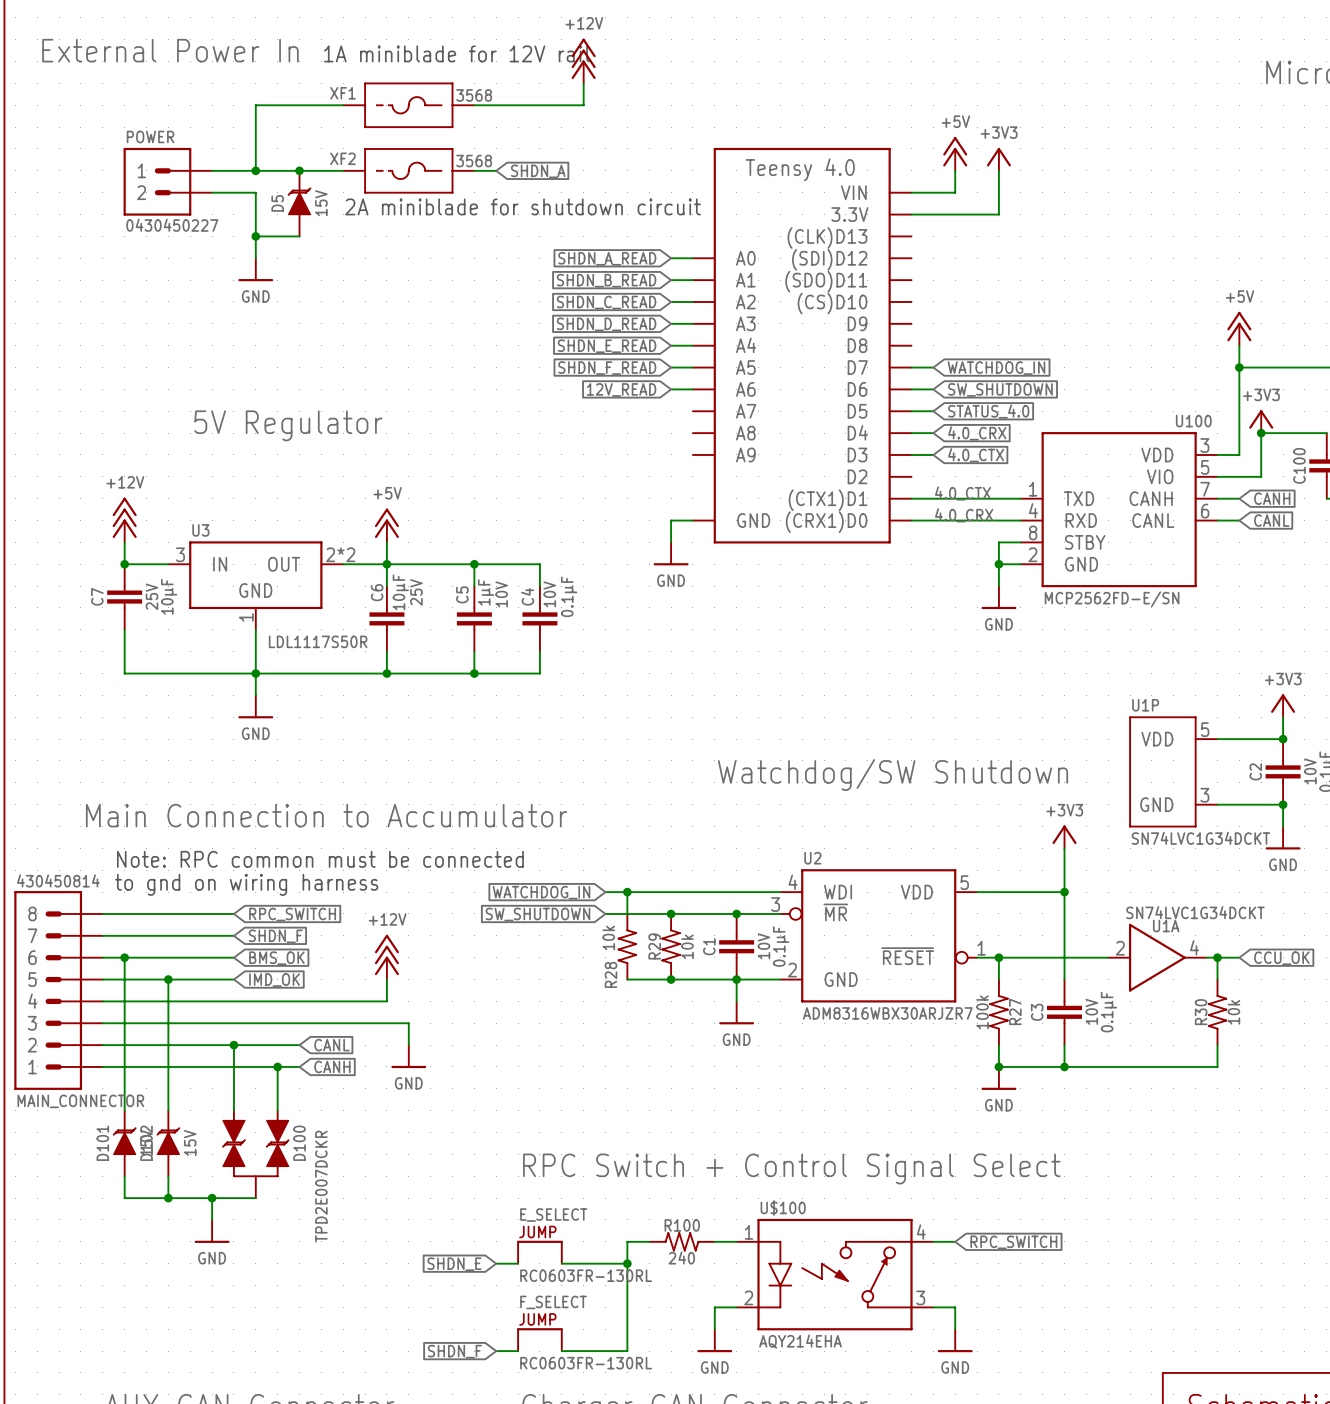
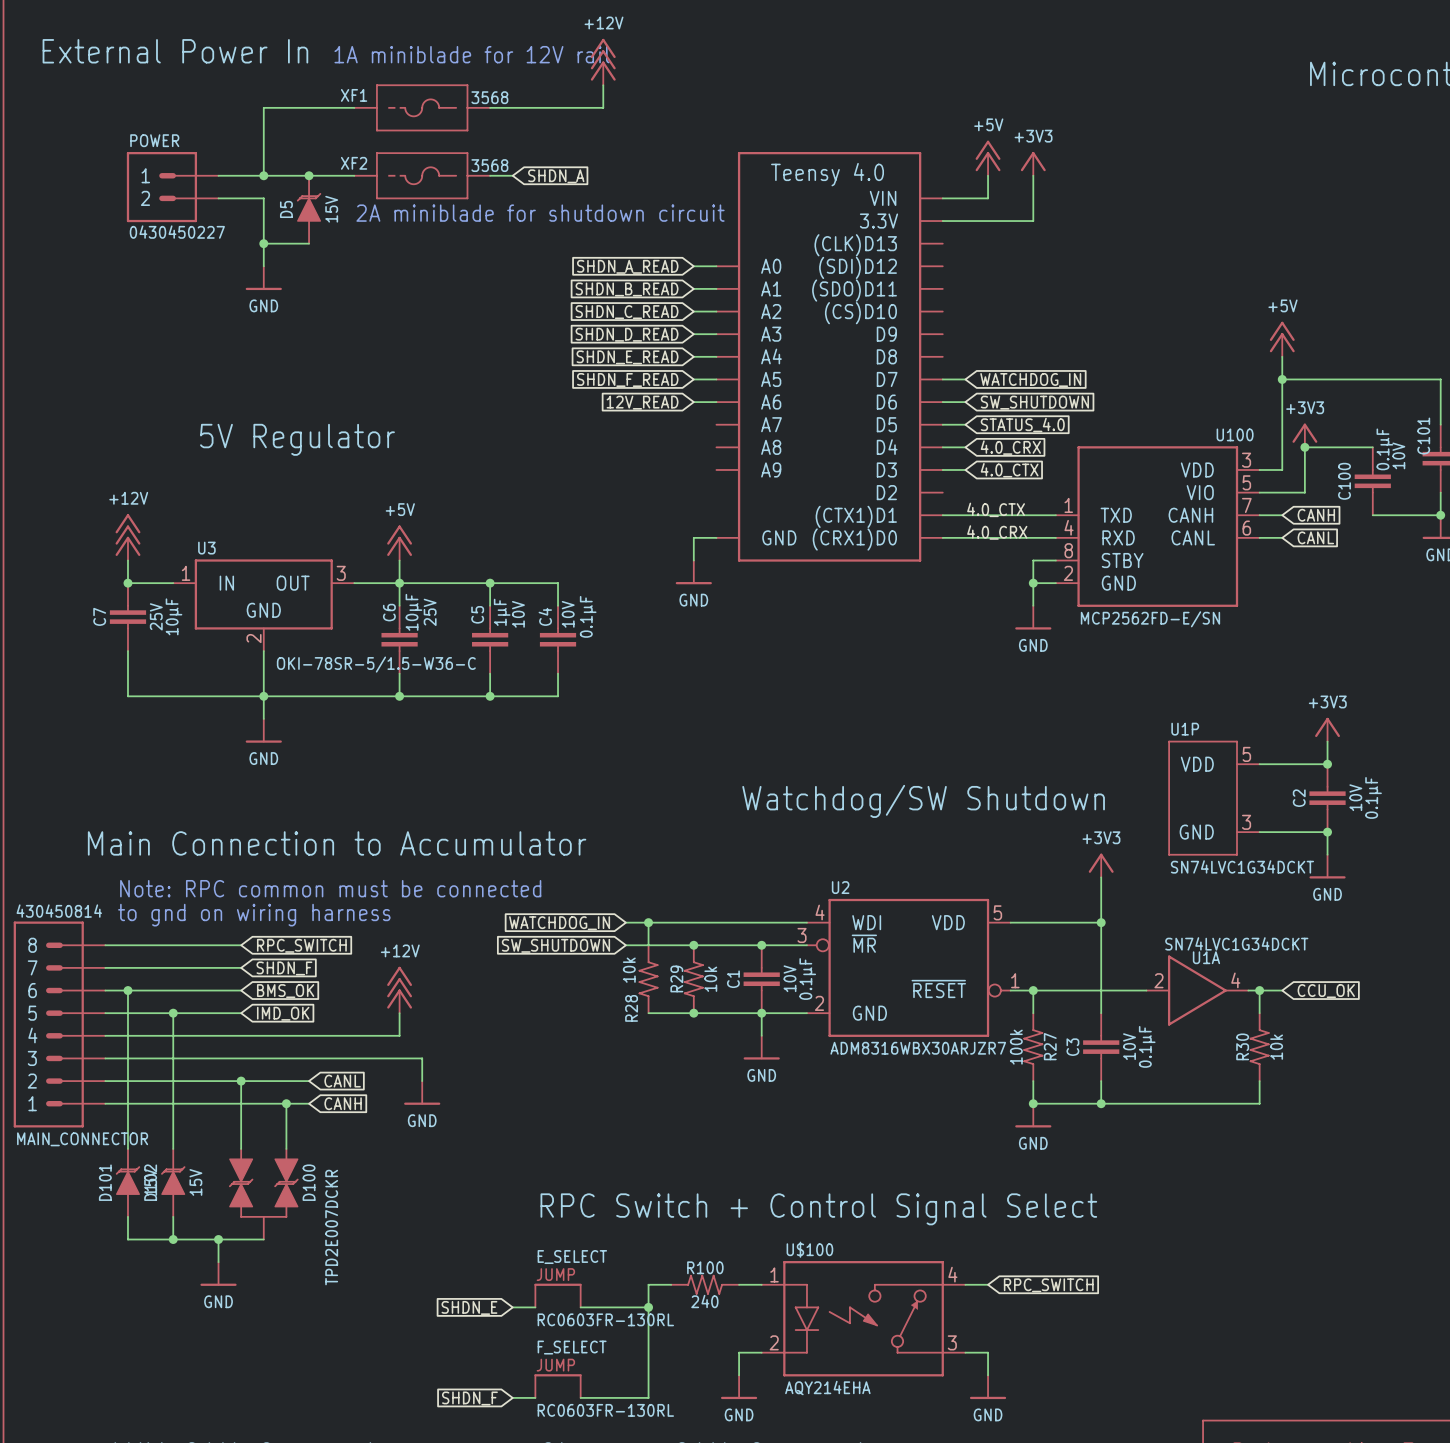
U3 pin number: 3 (180, 554) -> 1 (186, 573)
U3 pin number: 2*2 (340, 554) -> 3 (341, 573)
U3 pin number: 1 (246, 617) -> 2 (253, 638)
U3 text: LDL1117S50R (318, 641) -> OKI-78SR-5/1.5-W36-C (376, 664)

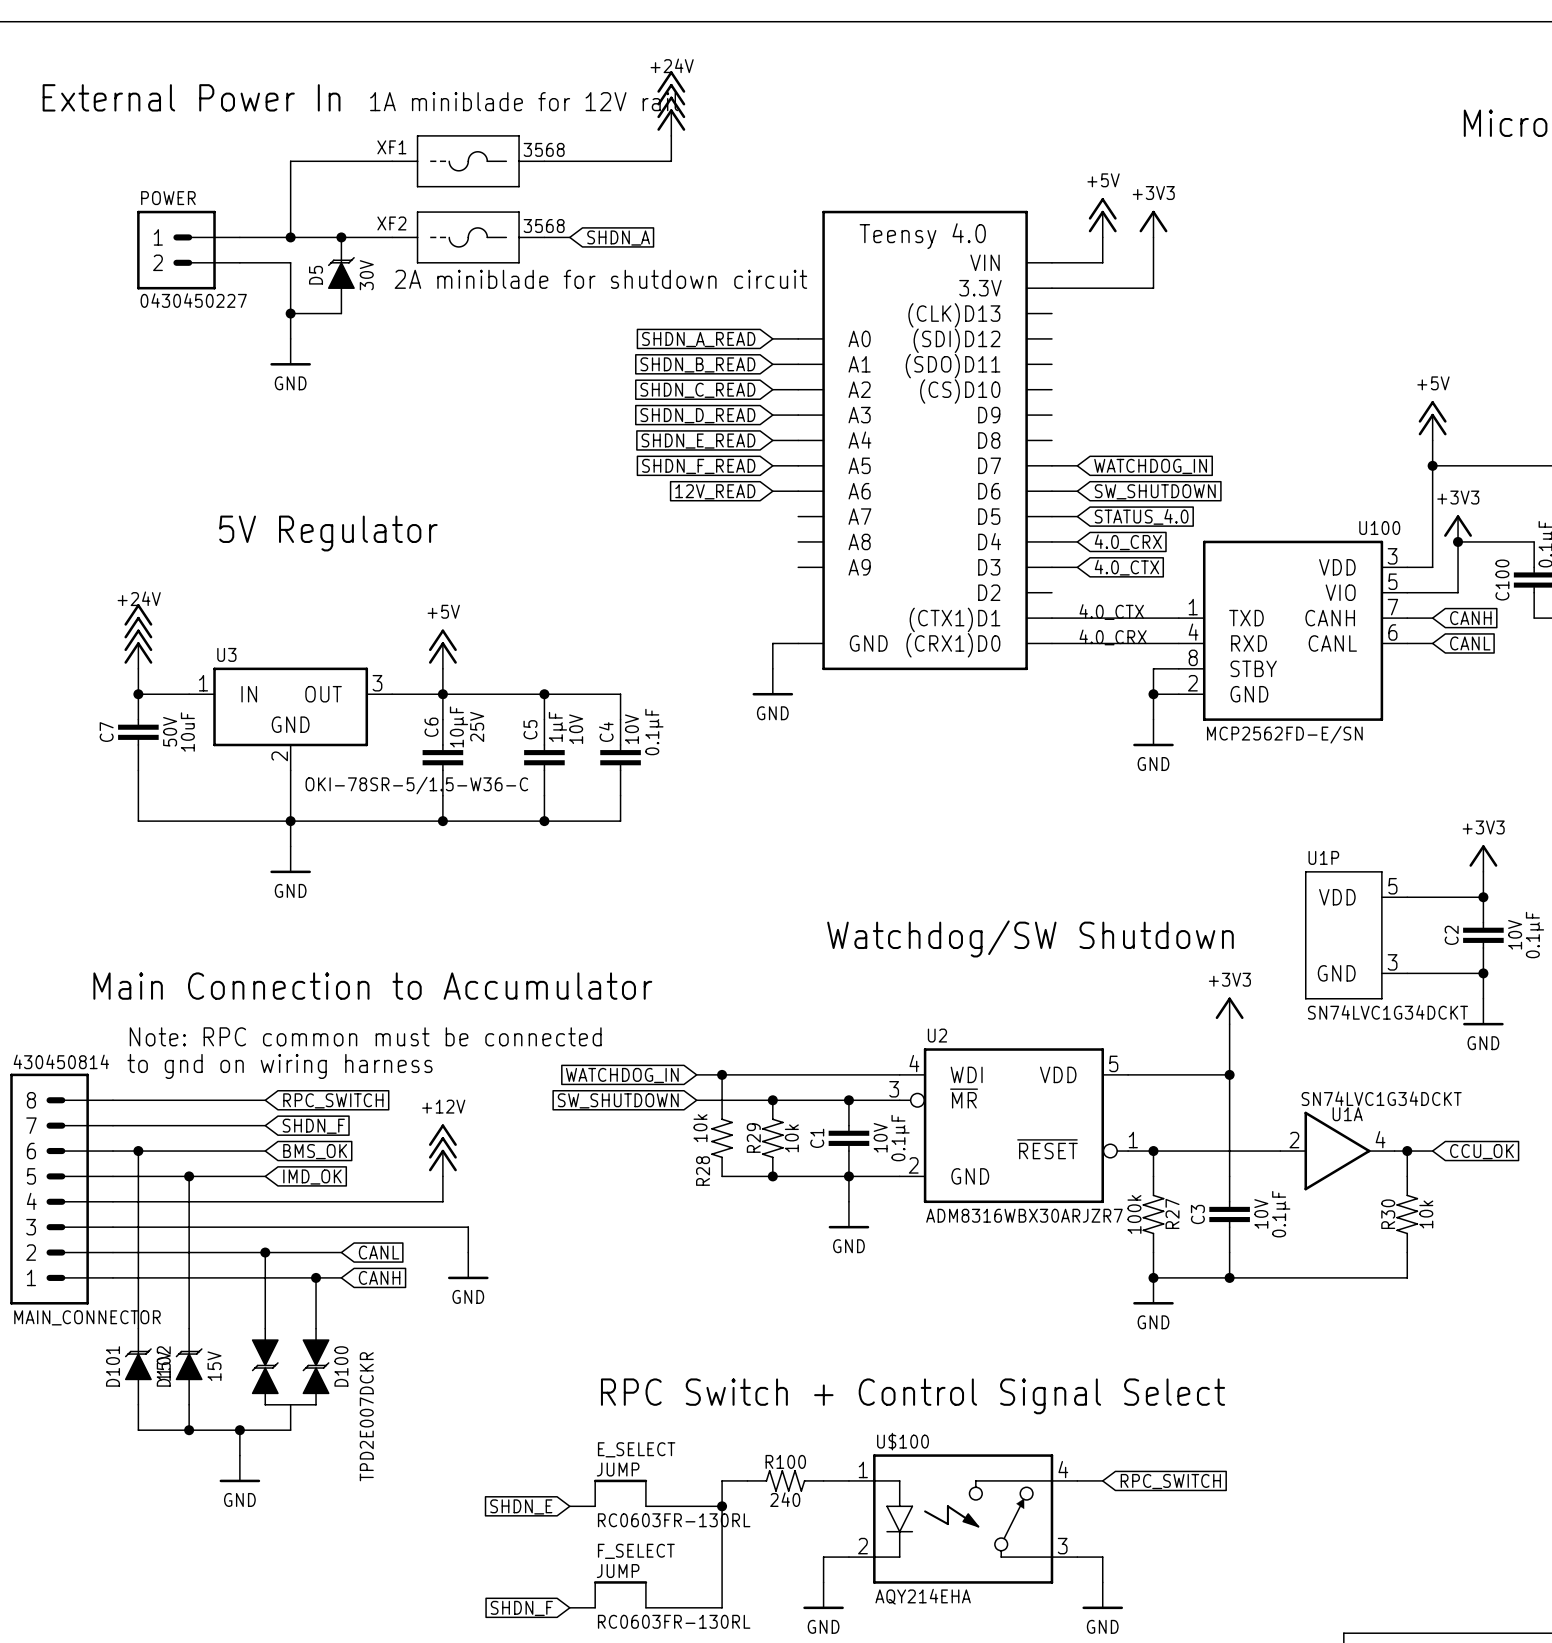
power symbol: +12V (603, 62) -> +24V (671, 103)
D5 text: 15V (331, 209) -> 30V (366, 275)
power symbol: +12V (127, 537) -> +24V (138, 636)
C7 text: 25V (156, 616) -> 50V (170, 731)
C7 text: 10µF (174, 616) -> 10uF (187, 732)

